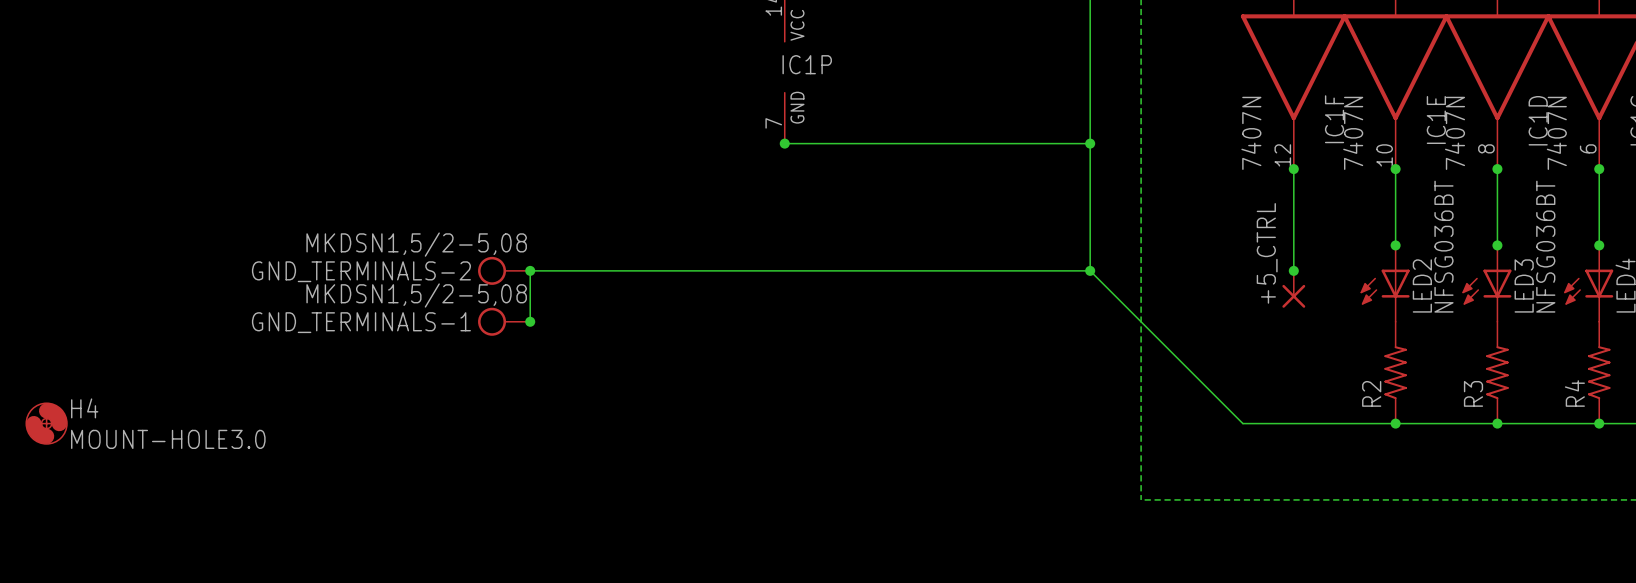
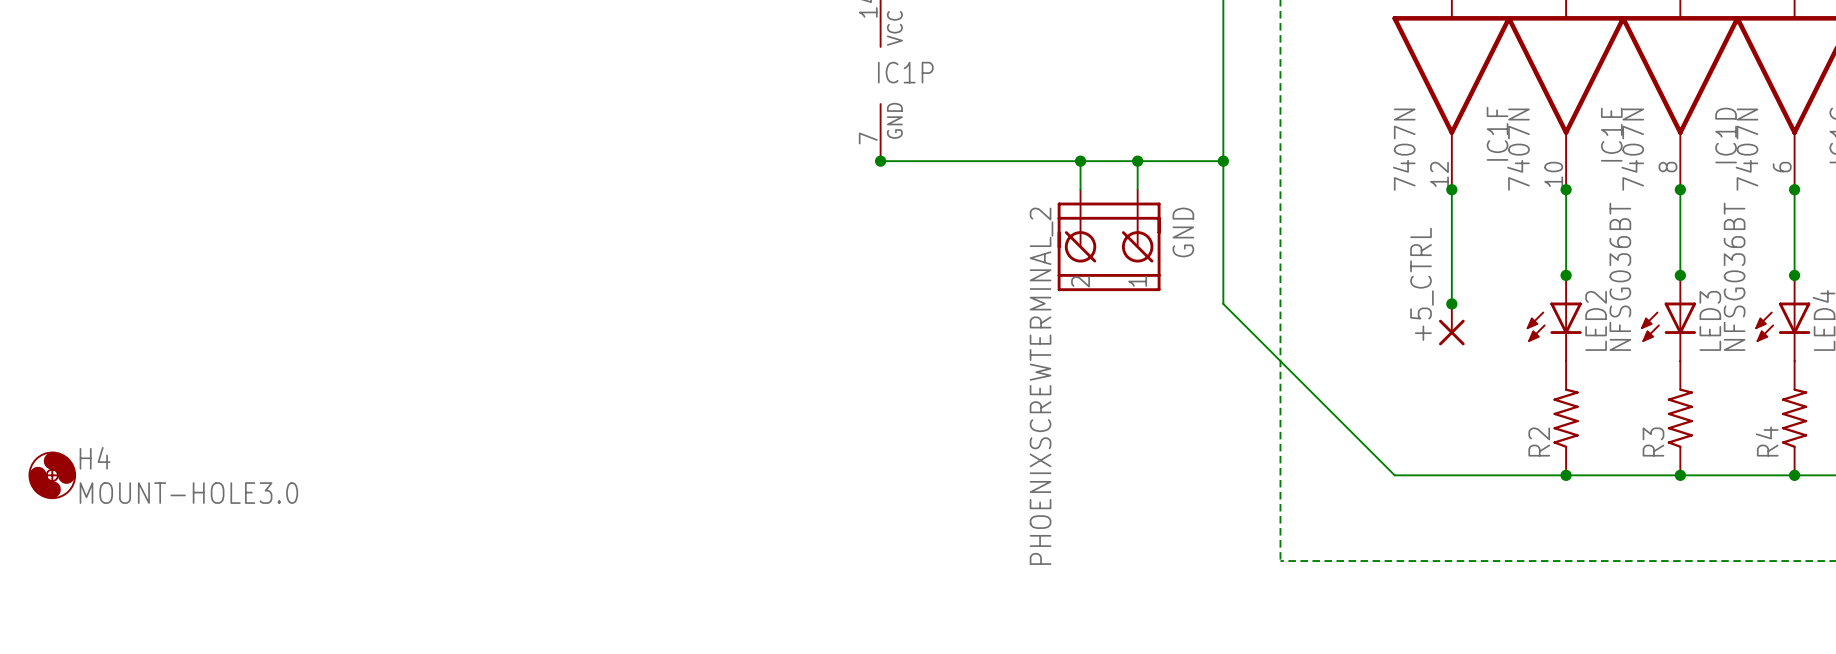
wire: none -> (1080, 161) (1080, 189)
junction: none -> (1080, 161)
wire: none -> (1137, 161) (1137, 189)
junction: none -> (1137, 161)
GND: none -> PHOENIXSCREWTERMINAL_2 (1109, 240)
GND_TERMINALS-2: MKDSN1,5/2-5,08 (504, 270) -> none
junction: (530, 270) -> none
wire: (1090, 270) (530, 270) (530, 321) -> none
junction: (1090, 270) -> none
GND_TERMINALS-1: MKDSN1,5/2-5,08 (504, 321) -> none
junction: (530, 321) -> none

